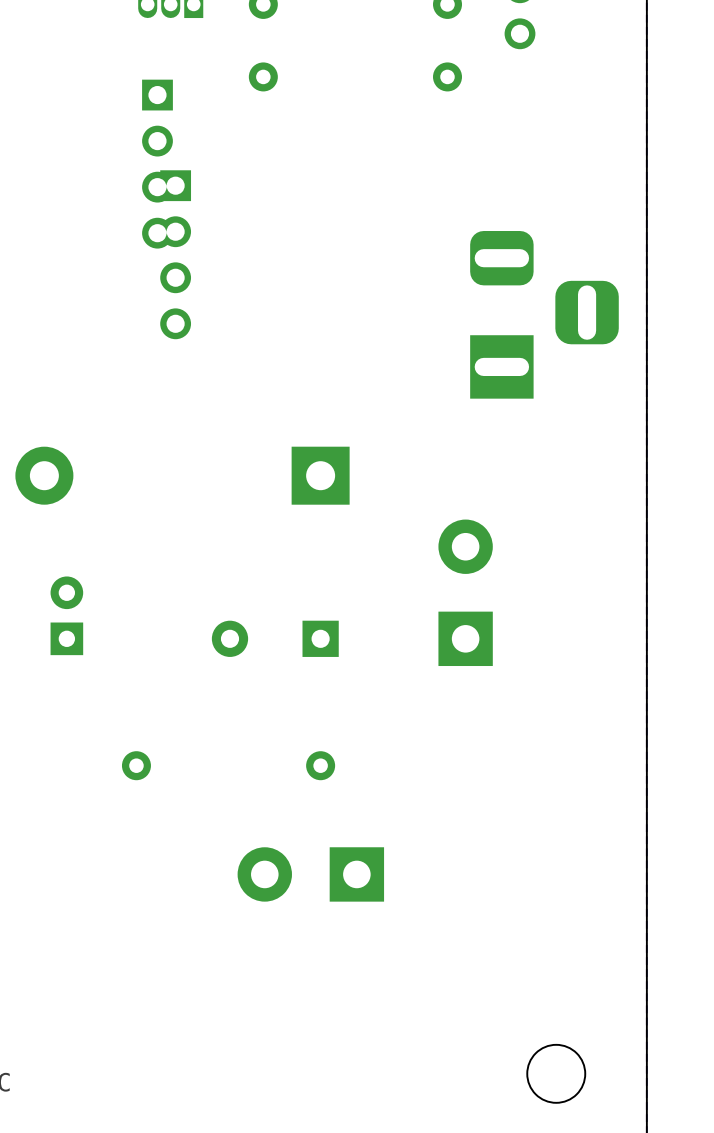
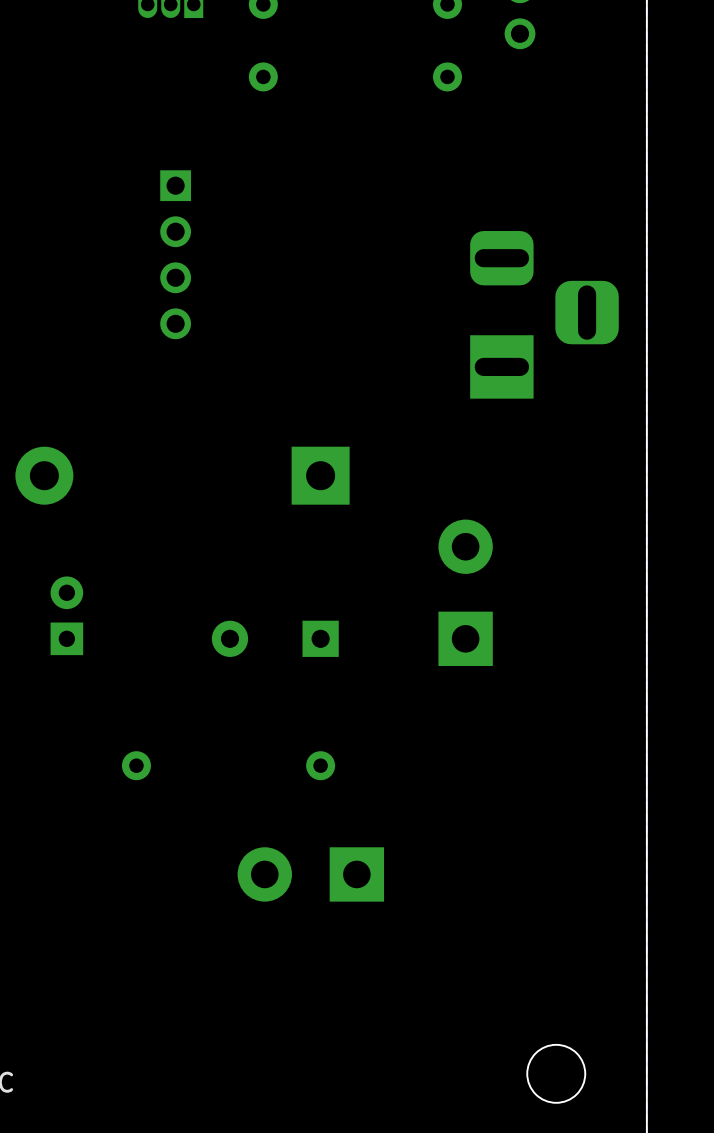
part: (157, 164) -> none

